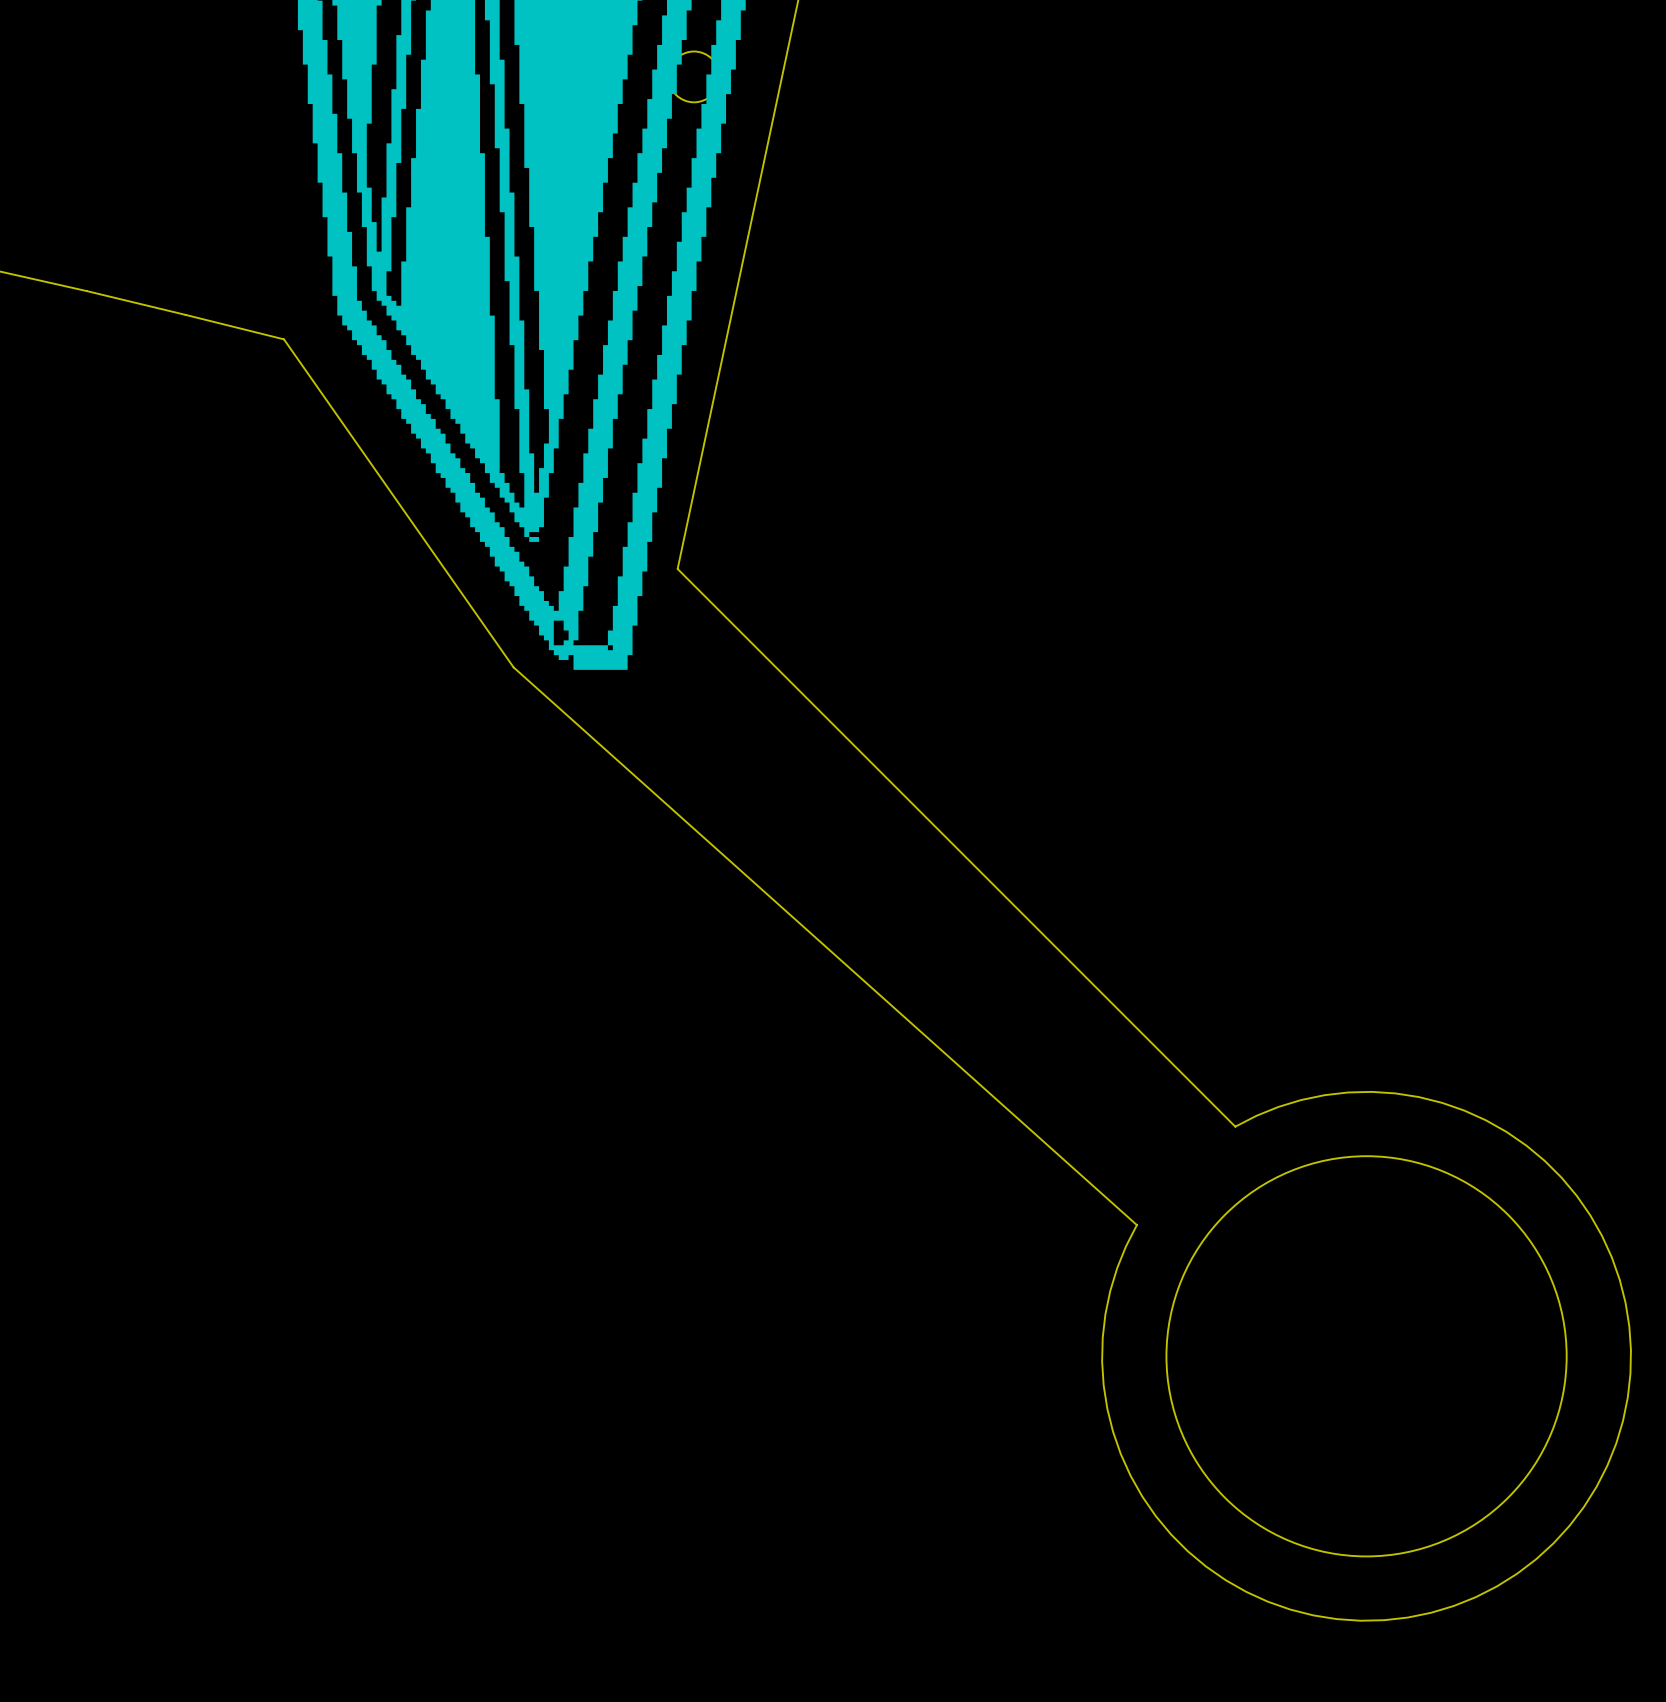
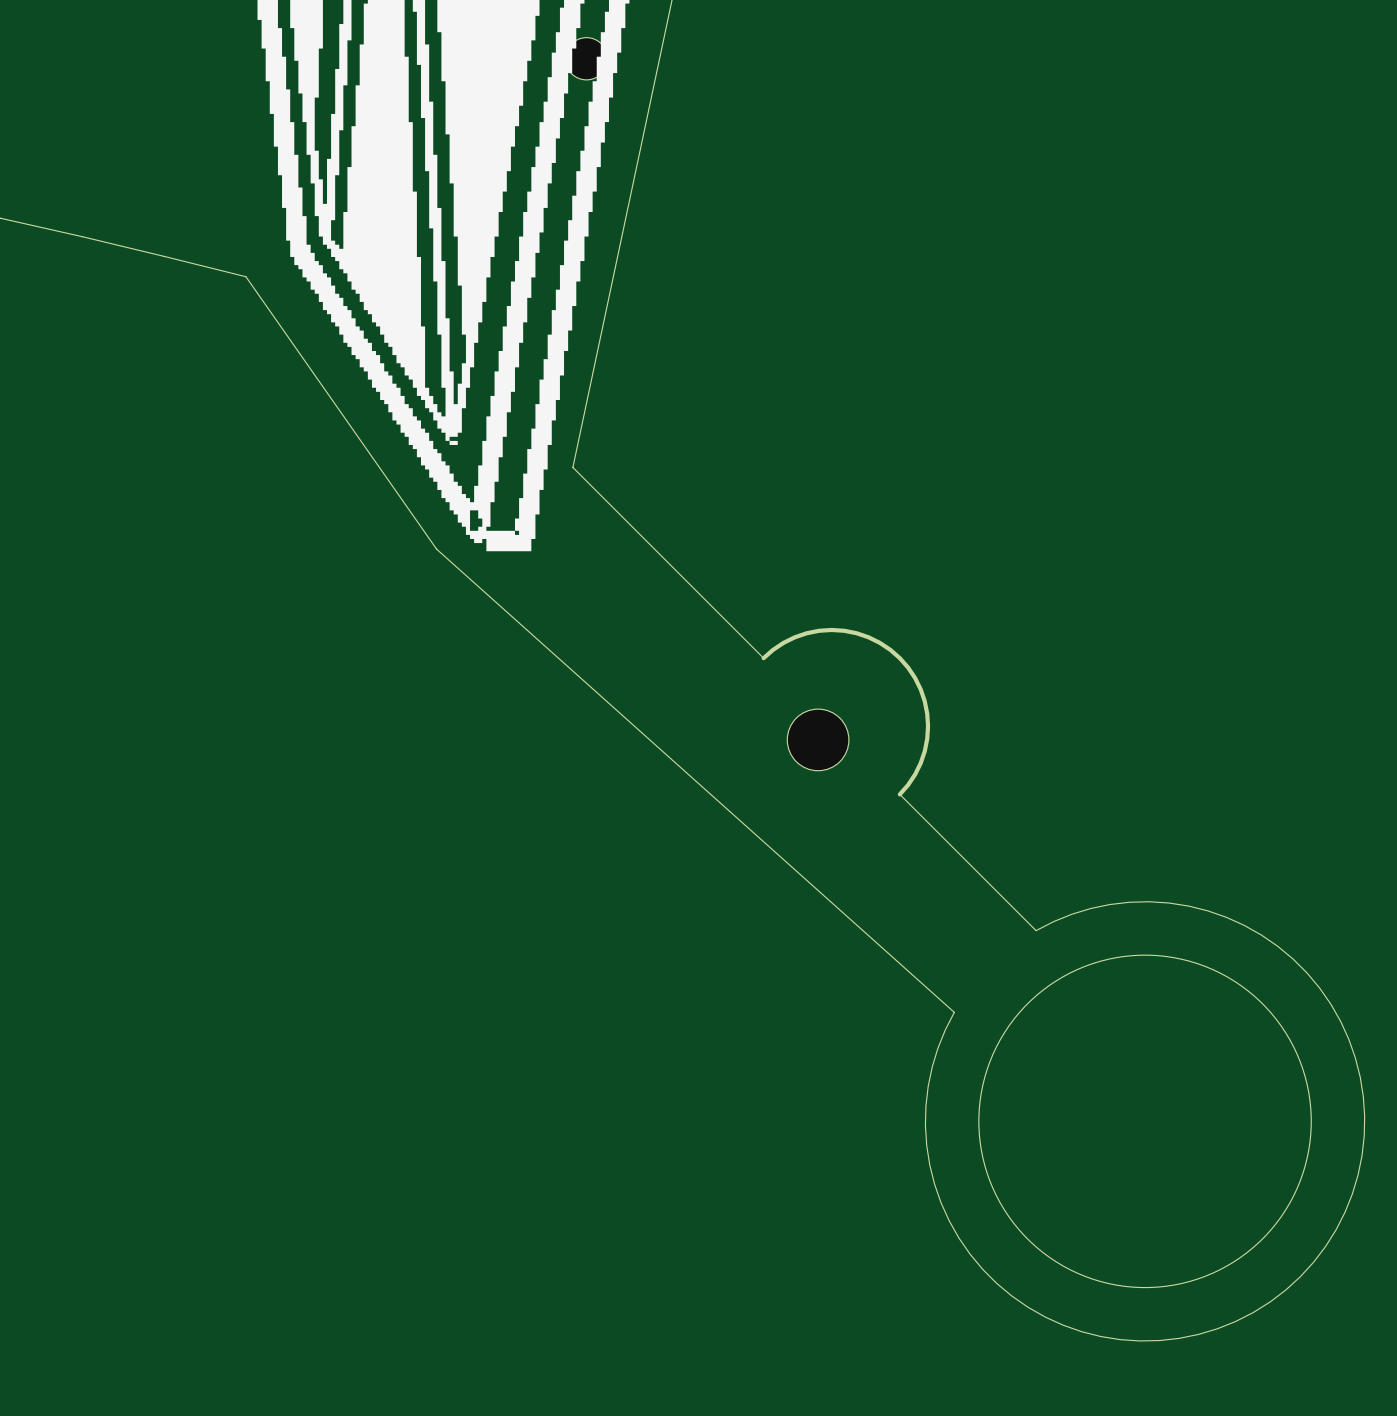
board edge: (907, 798) (1071, 962) -> (763, 658) (783, 642) (794, 637) (806, 633) (831, 629) (856, 633) (868, 637) (879, 642) (899, 658) (915, 678) (920, 689) (924, 701) (928, 726) (924, 751) (920, 763) (915, 774) (899, 794)
part: none -> (818, 739)

